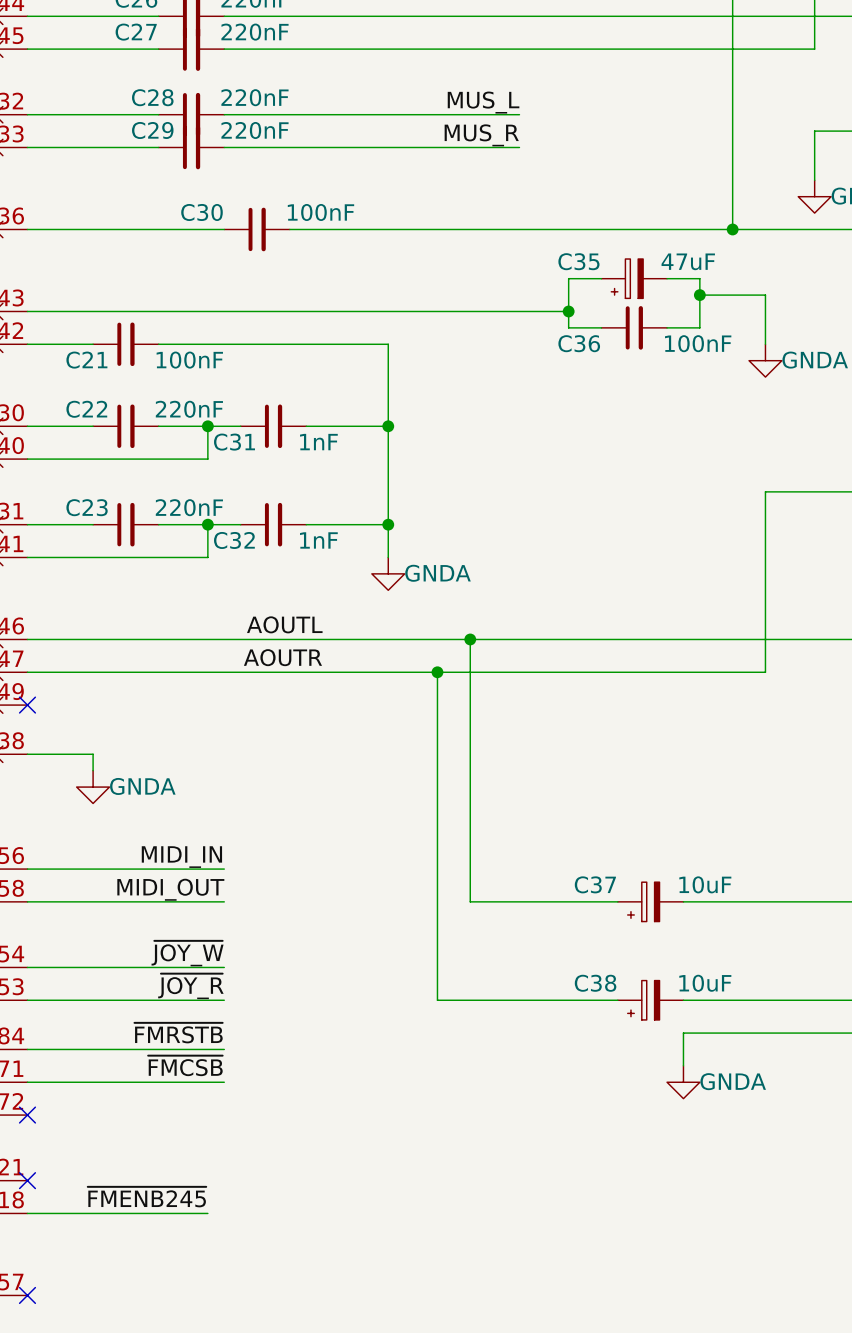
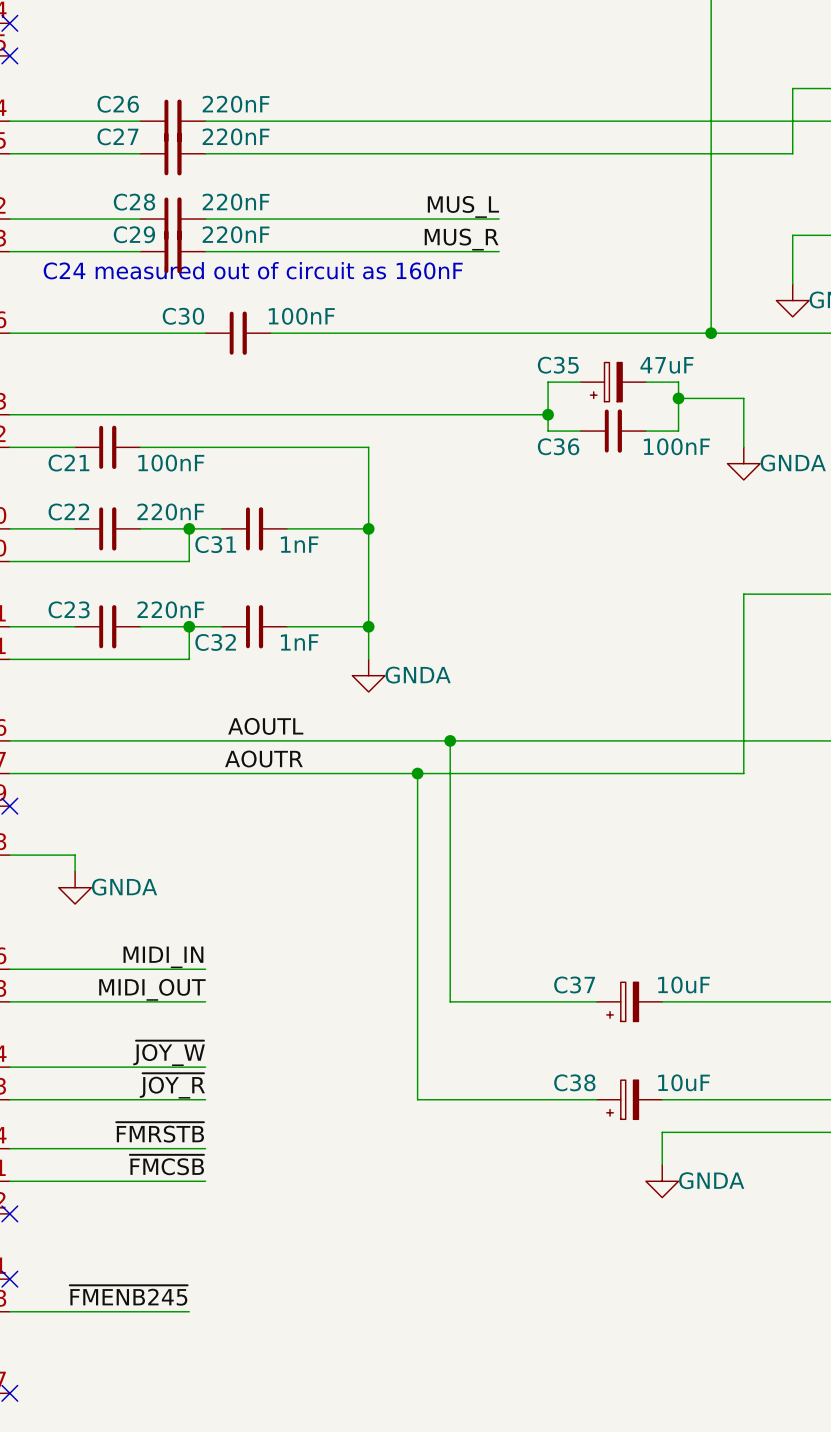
text: none -> C24 measured out of circuit as 160nF (253, 270)

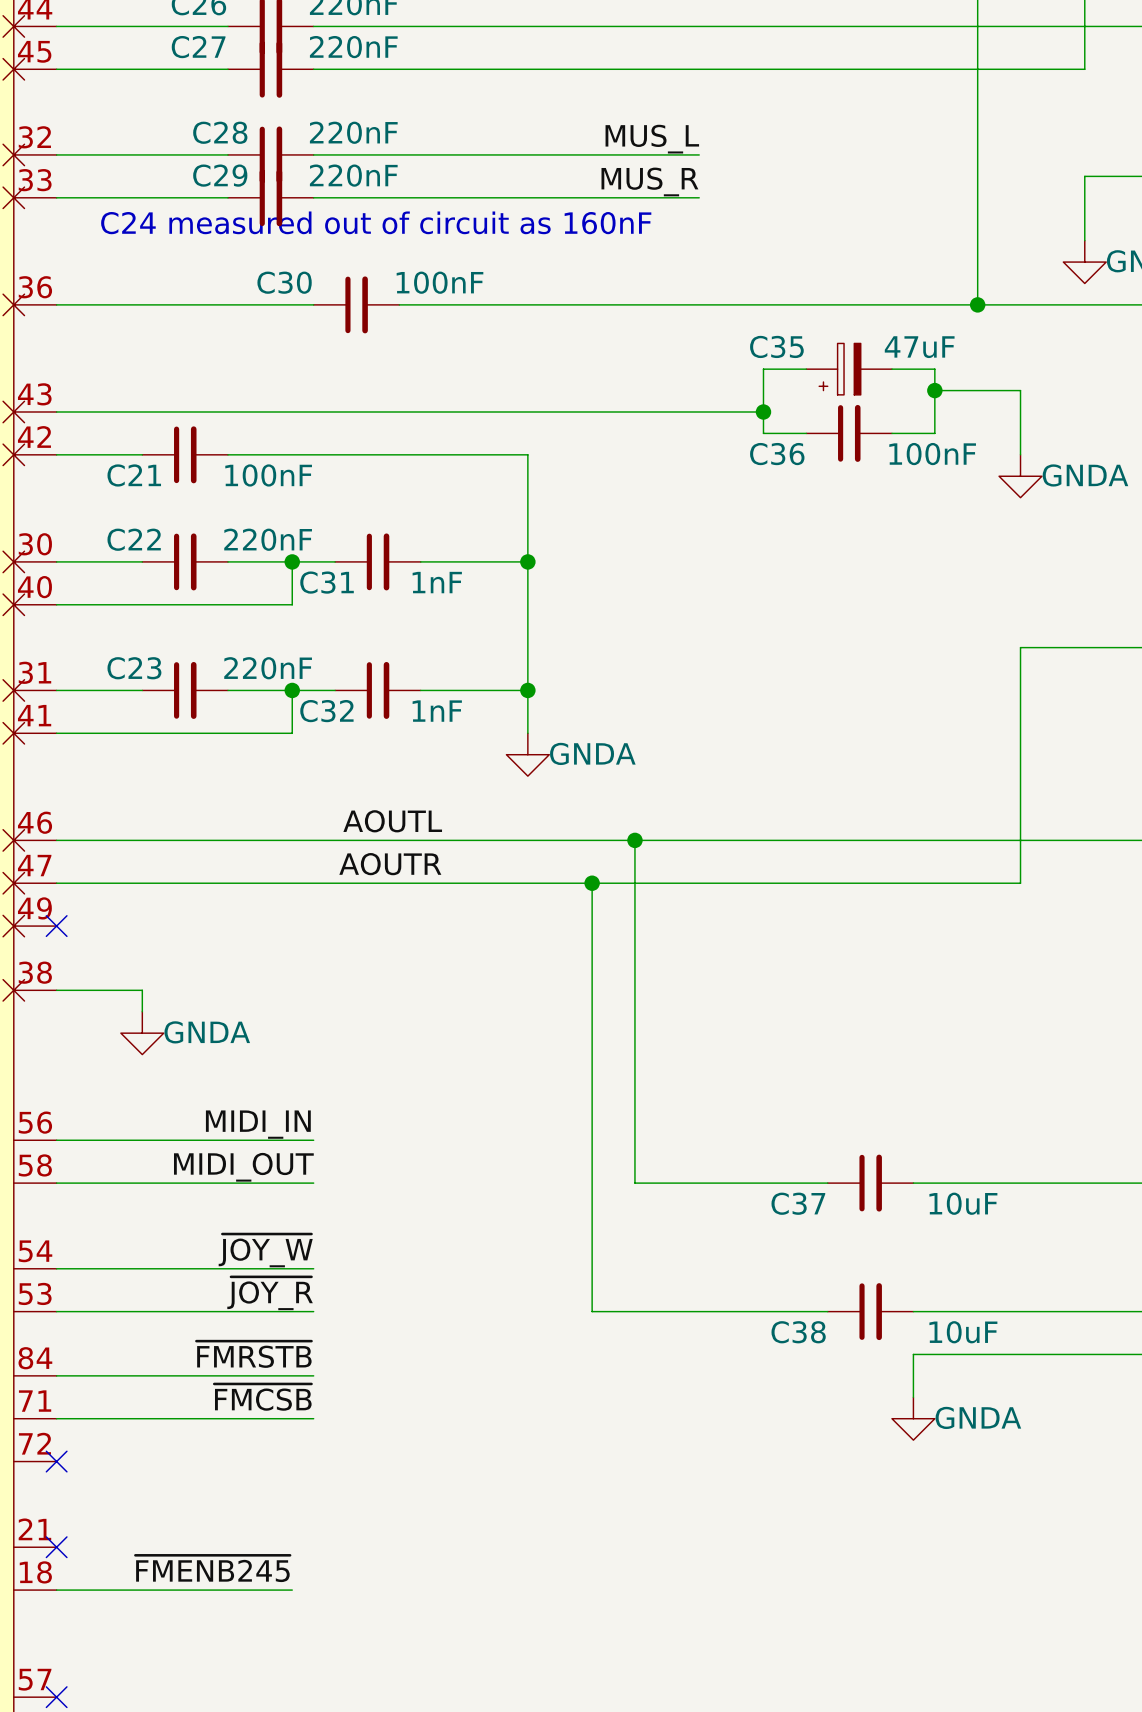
C37 symbol: [596, 982, 663, 1022] -> [827, 1154, 914, 1212]
C37 name position: C37 (574, 984) -> C37 (798, 1203)
C37 value position: 10uF (683, 984) -> 10uF (963, 1203)
C38 symbol: [596, 1080, 663, 1120] -> [827, 1283, 914, 1341]
C38 name position: C38 (574, 1082) -> C38 (798, 1332)
C38 value position: 10uF (683, 1082) -> 10uF (963, 1332)

